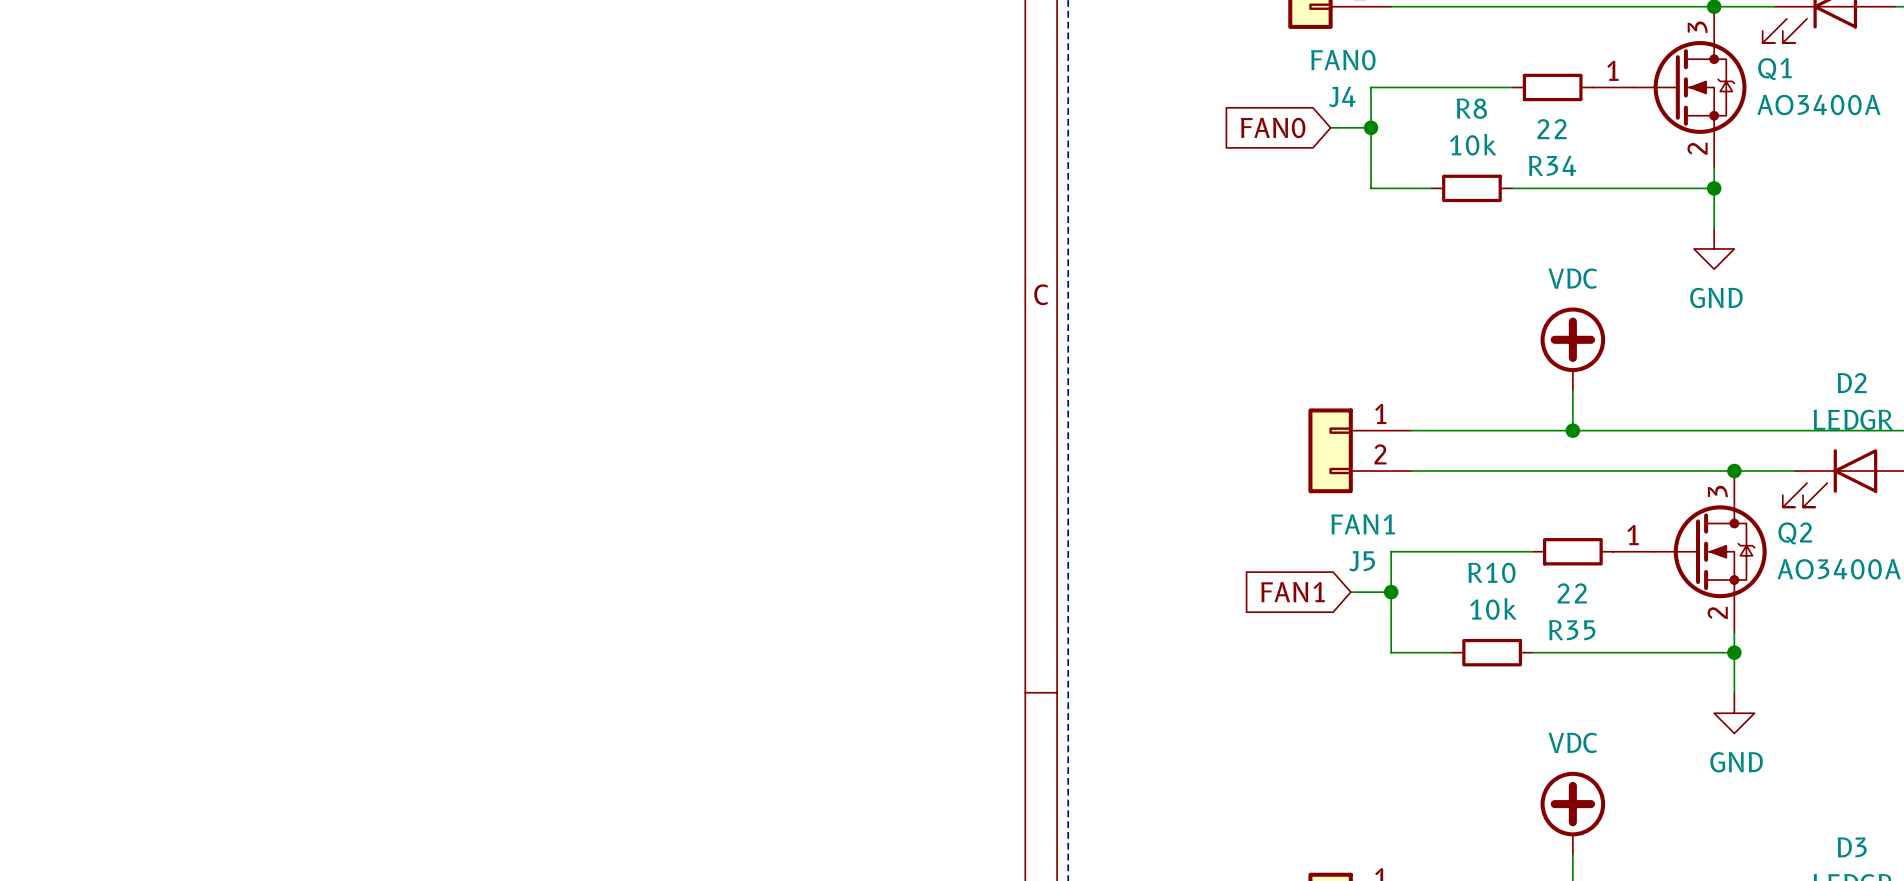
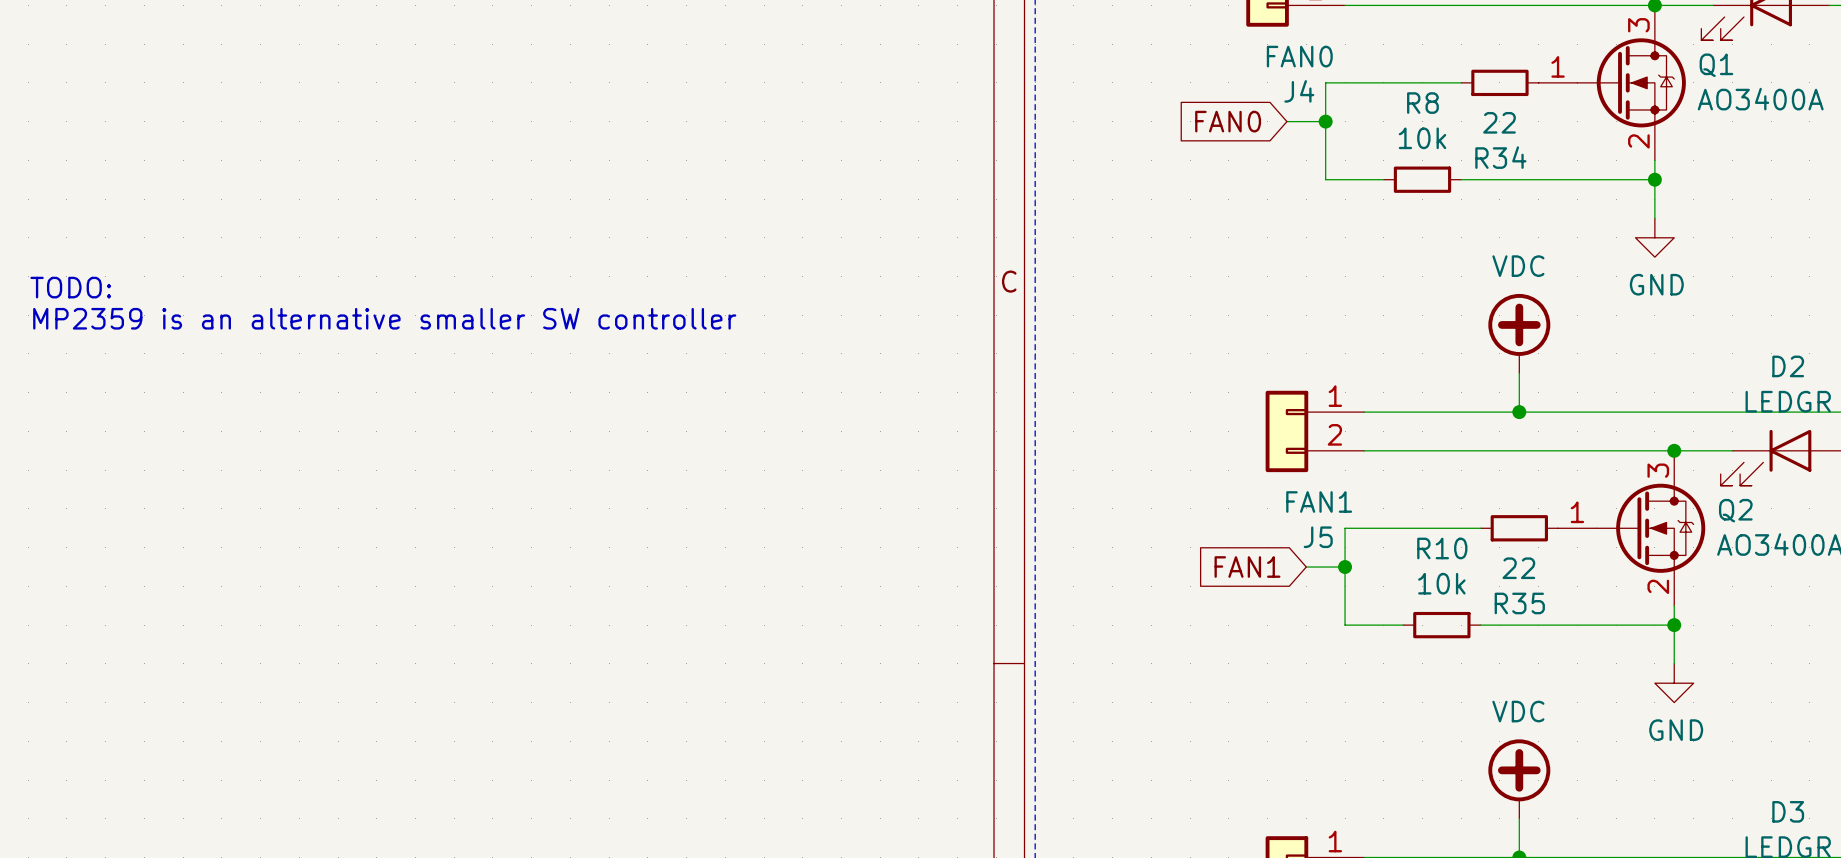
text: none -> TODO: (70, 287)
text: none -> MP2359 is an alternative smaller SW controller (384, 318)

